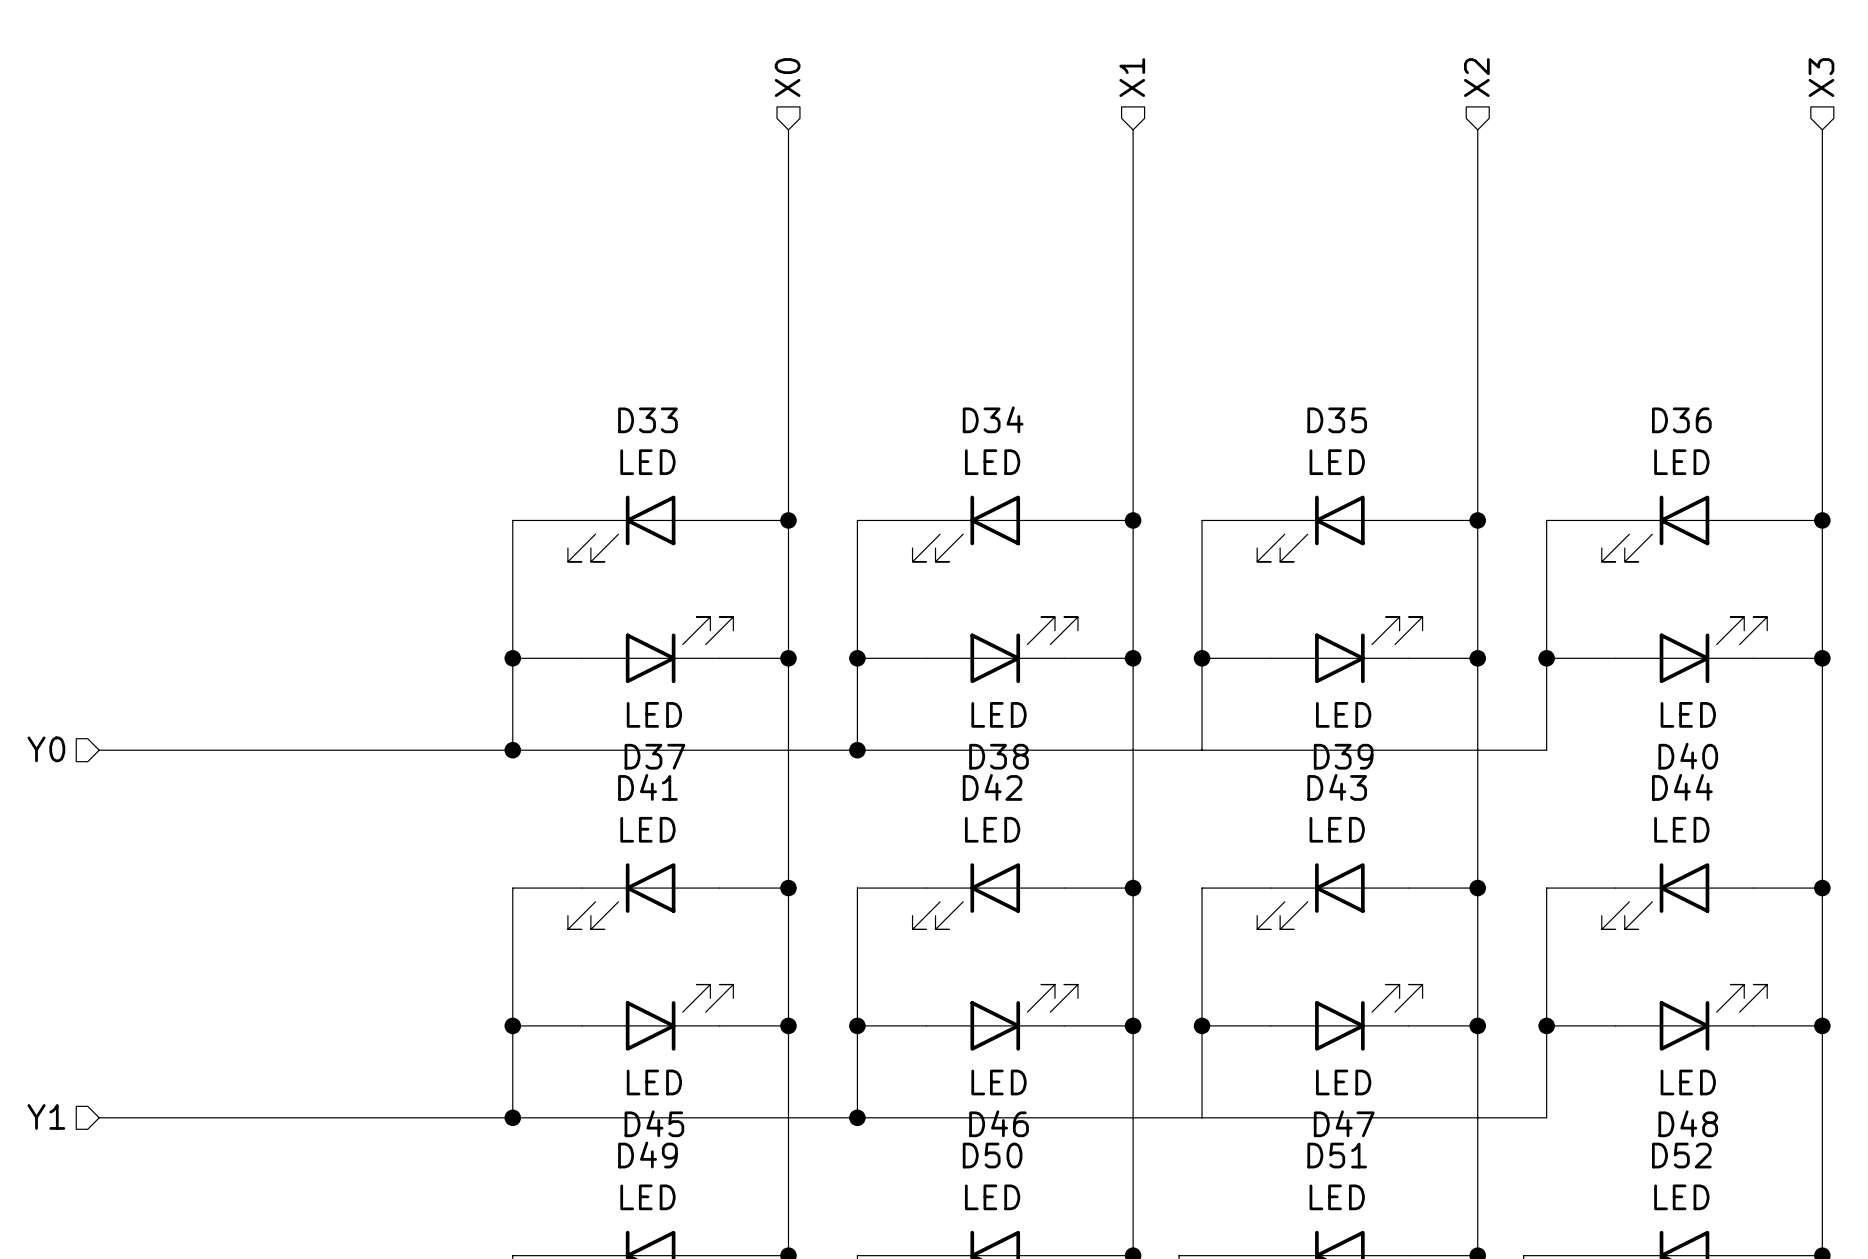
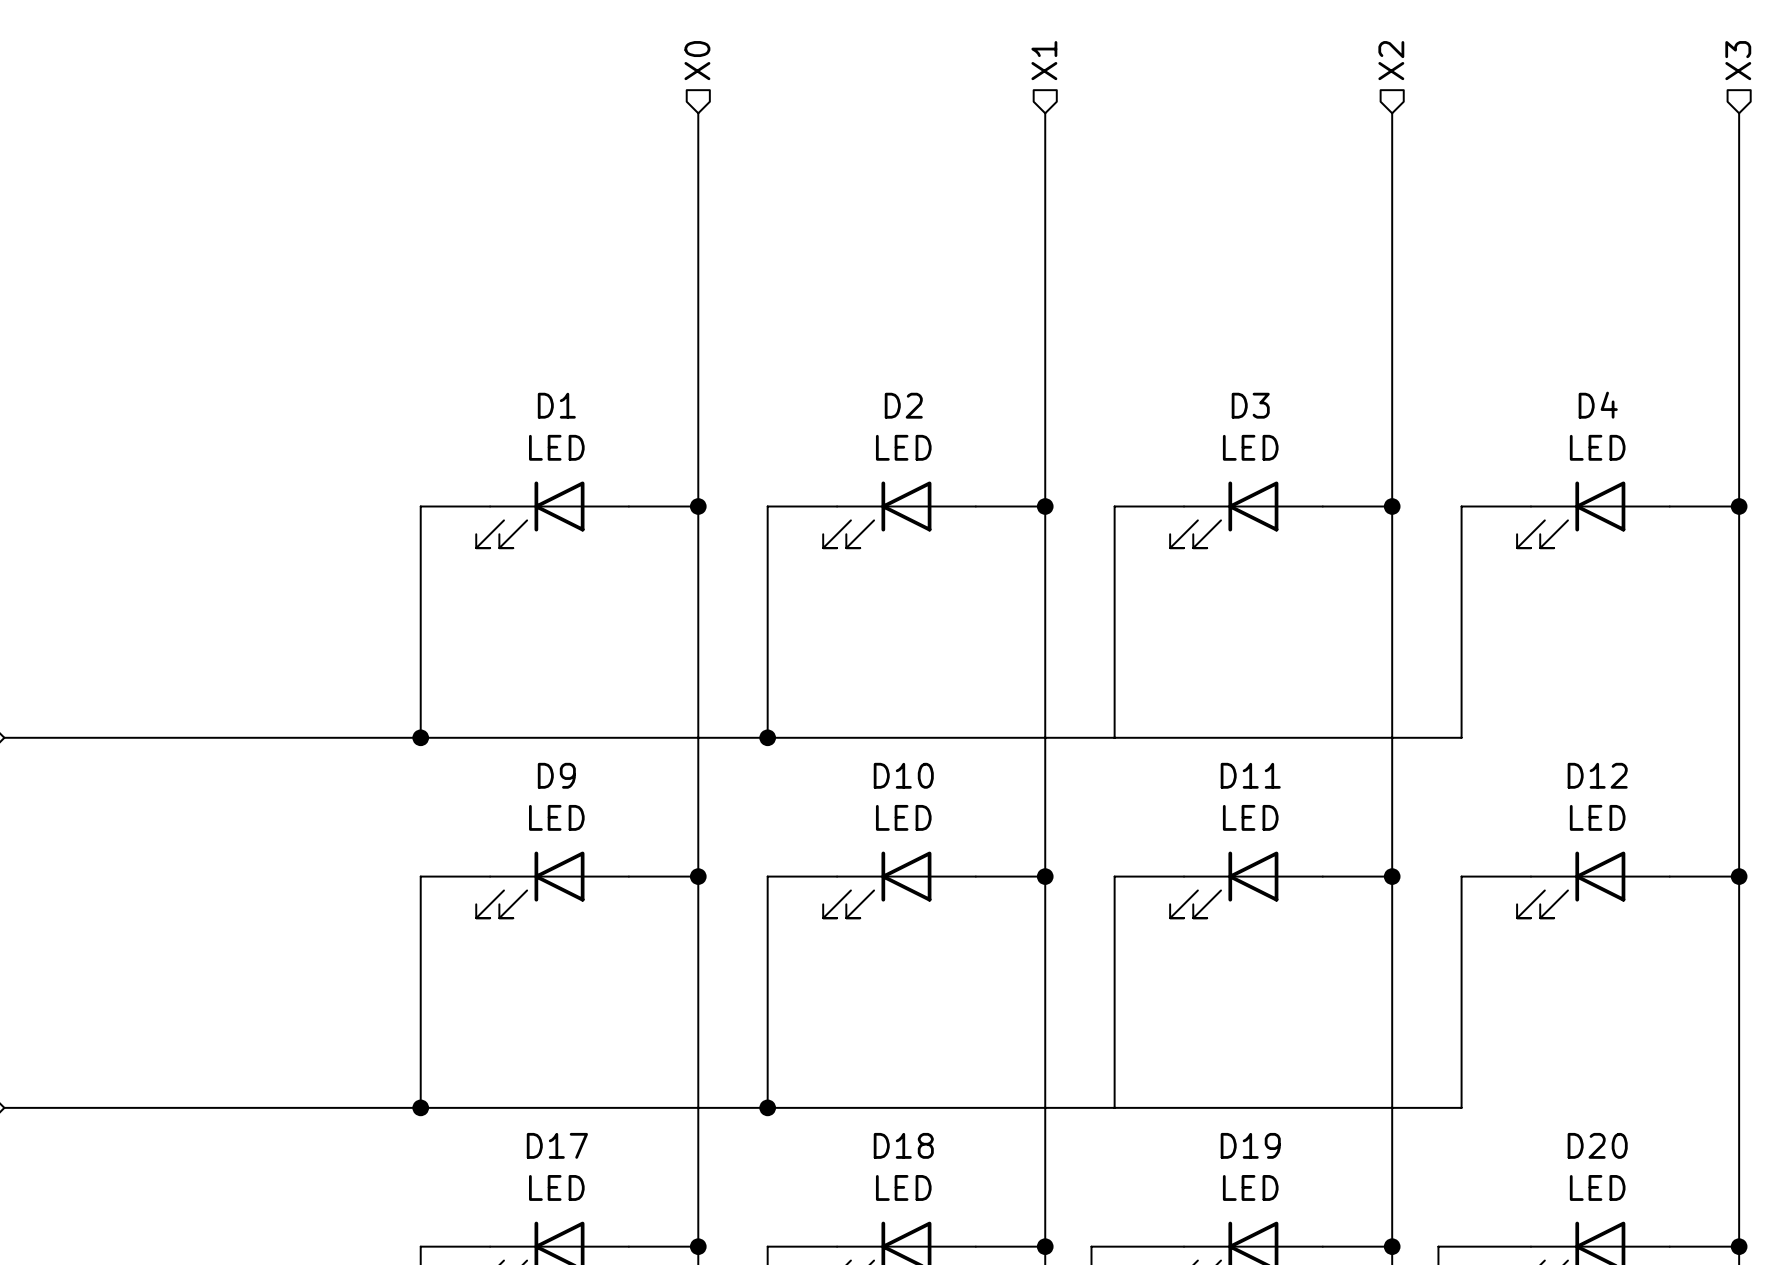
D34 name: D34 (993, 419) -> D2 (903, 405)
D33 name: D33 (647, 420) -> D1 (556, 405)
D35 name: D35 (1337, 420) -> D3 (1250, 405)
D36 name: D36 (1681, 420) -> D4 (1598, 405)
D37: LED (657, 650) -> none
D38: LED (1002, 650) -> none
D39: LED (1346, 650) -> none
D40: LED (1691, 650) -> none
wire: (512, 658) (581, 658) -> none
junction: (512, 658) -> none
wire: (719, 658) (788, 658) -> none
junction: (788, 658) -> none
wire: (857, 658) (926, 658) -> none
junction: (857, 658) -> none
wire: (1064, 658) (1133, 658) -> none
junction: (1133, 658) -> none
wire: (1202, 658) (1270, 658) -> none
junction: (1202, 658) -> none
wire: (1408, 658) (1477, 658) -> none
junction: (1477, 658) -> none
wire: (1546, 658) (1615, 658) -> none
junction: (1546, 658) -> none
wire: (1753, 658) (1822, 658) -> none
junction: (1822, 658) -> none
D41 name: D41 (647, 787) -> D9 (556, 775)
D42 name: D42 (992, 787) -> D10 (903, 775)
D43 name: D43 (1337, 787) -> D11 (1250, 775)
D44 name: D44 (1682, 787) -> D12 (1597, 775)
D45: LED (657, 1017) -> none
D46: LED (1002, 1017) -> none
D47: LED (1346, 1017) -> none
D48: LED (1691, 1017) -> none
wire: (512, 1025) (581, 1025) -> none
junction: (512, 1025) -> none
wire: (719, 1025) (788, 1025) -> none
junction: (788, 1025) -> none
wire: (857, 1025) (926, 1025) -> none
junction: (857, 1025) -> none
wire: (1064, 1025) (1133, 1025) -> none
junction: (1133, 1025) -> none
wire: (1202, 1025) (1270, 1025) -> none
junction: (1202, 1025) -> none
wire: (1408, 1025) (1477, 1025) -> none
junction: (1477, 1025) -> none
wire: (1546, 1025) (1615, 1025) -> none
junction: (1546, 1025) -> none
wire: (1753, 1025) (1822, 1025) -> none
junction: (1822, 1025) -> none
D49 name: D49 (647, 1155) -> D17 (557, 1145)
D50 name: D50 (992, 1155) -> D18 (903, 1145)
D51 name: D51 (1337, 1155) -> D19 (1250, 1145)
D52 name: D52 (1681, 1155) -> D20 (1597, 1145)

